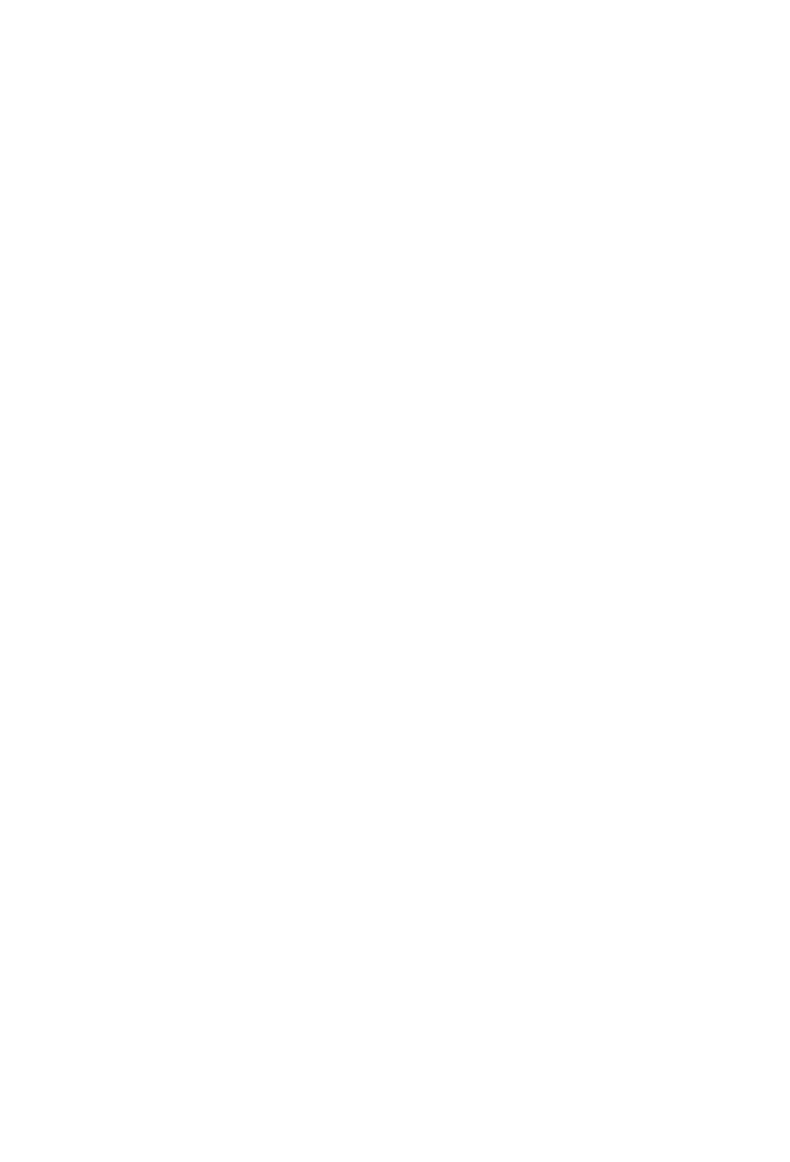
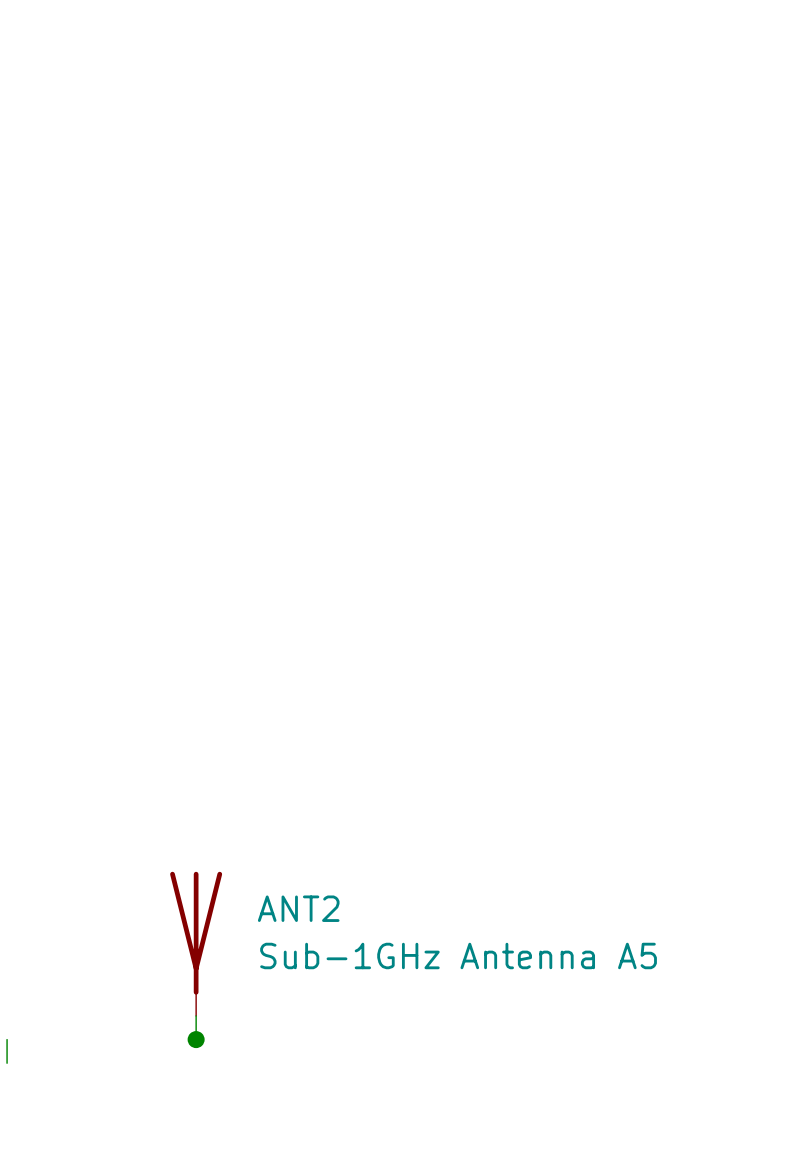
ANT2: none -> Sub-1GHz Antenna A5 (196, 943)
wire: none -> (196, 1015) (196, 1039)
wire: none -> (7, 1039) (7, 1063)
junction: none -> (196, 1039)

